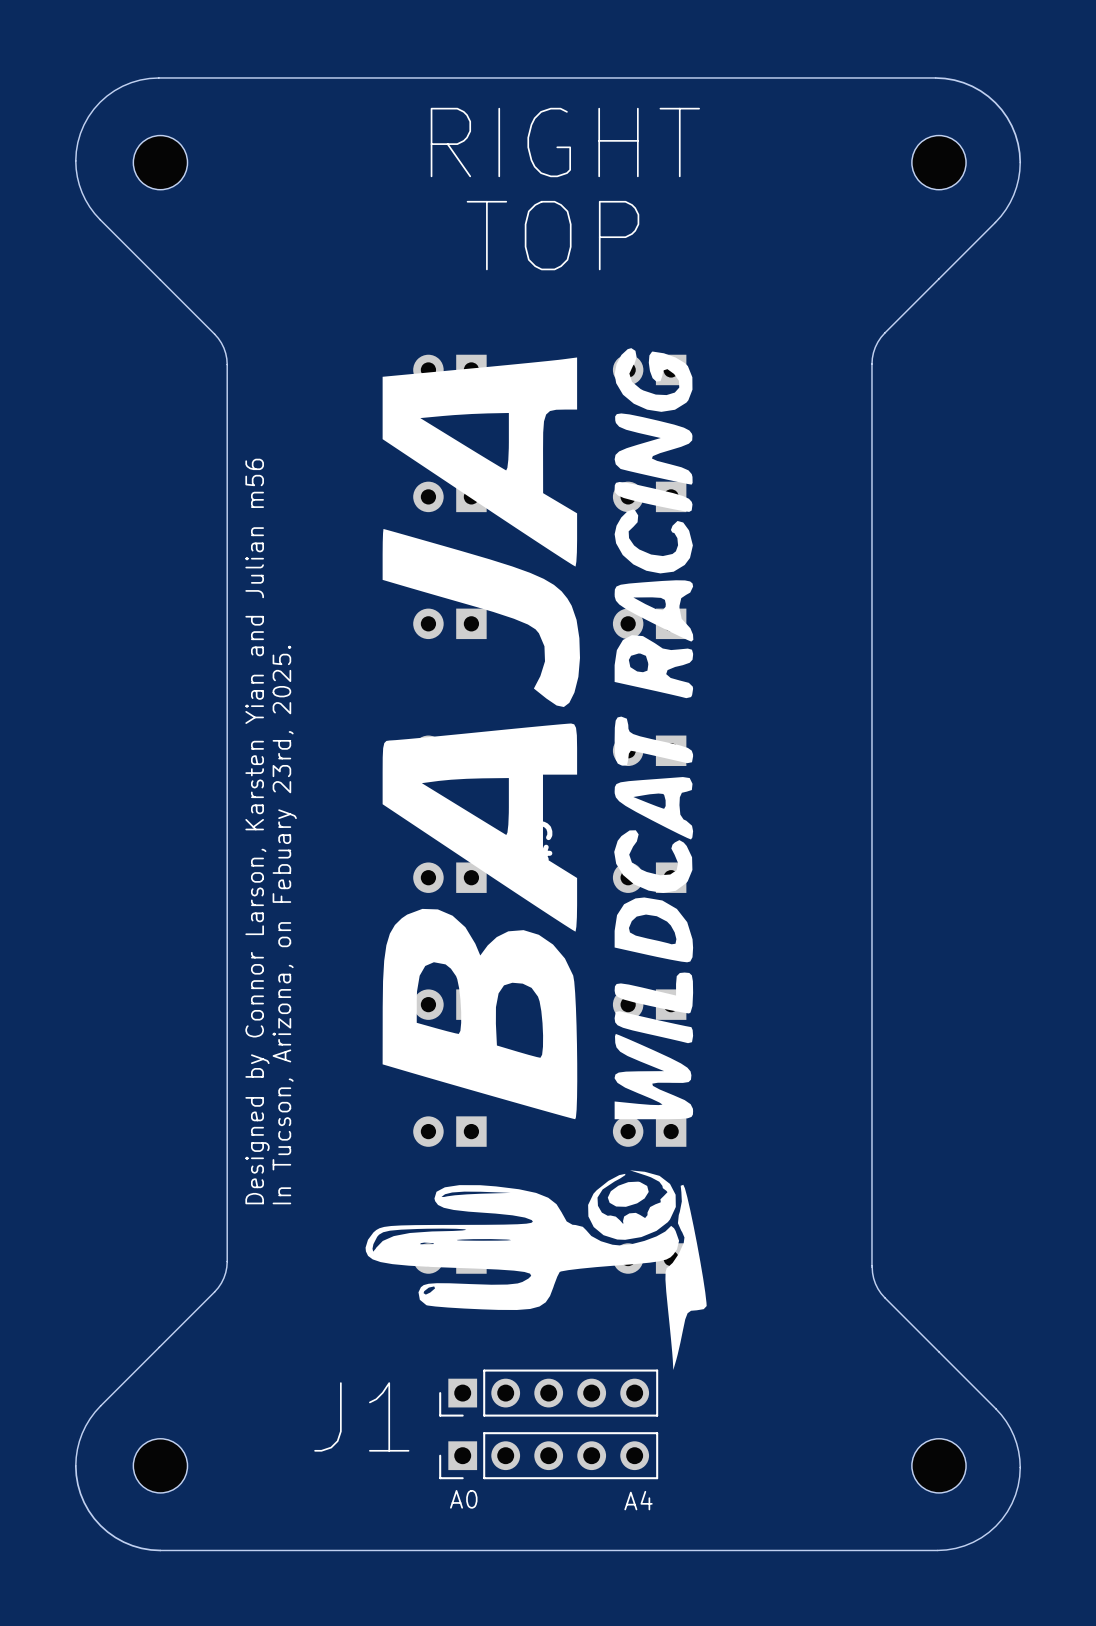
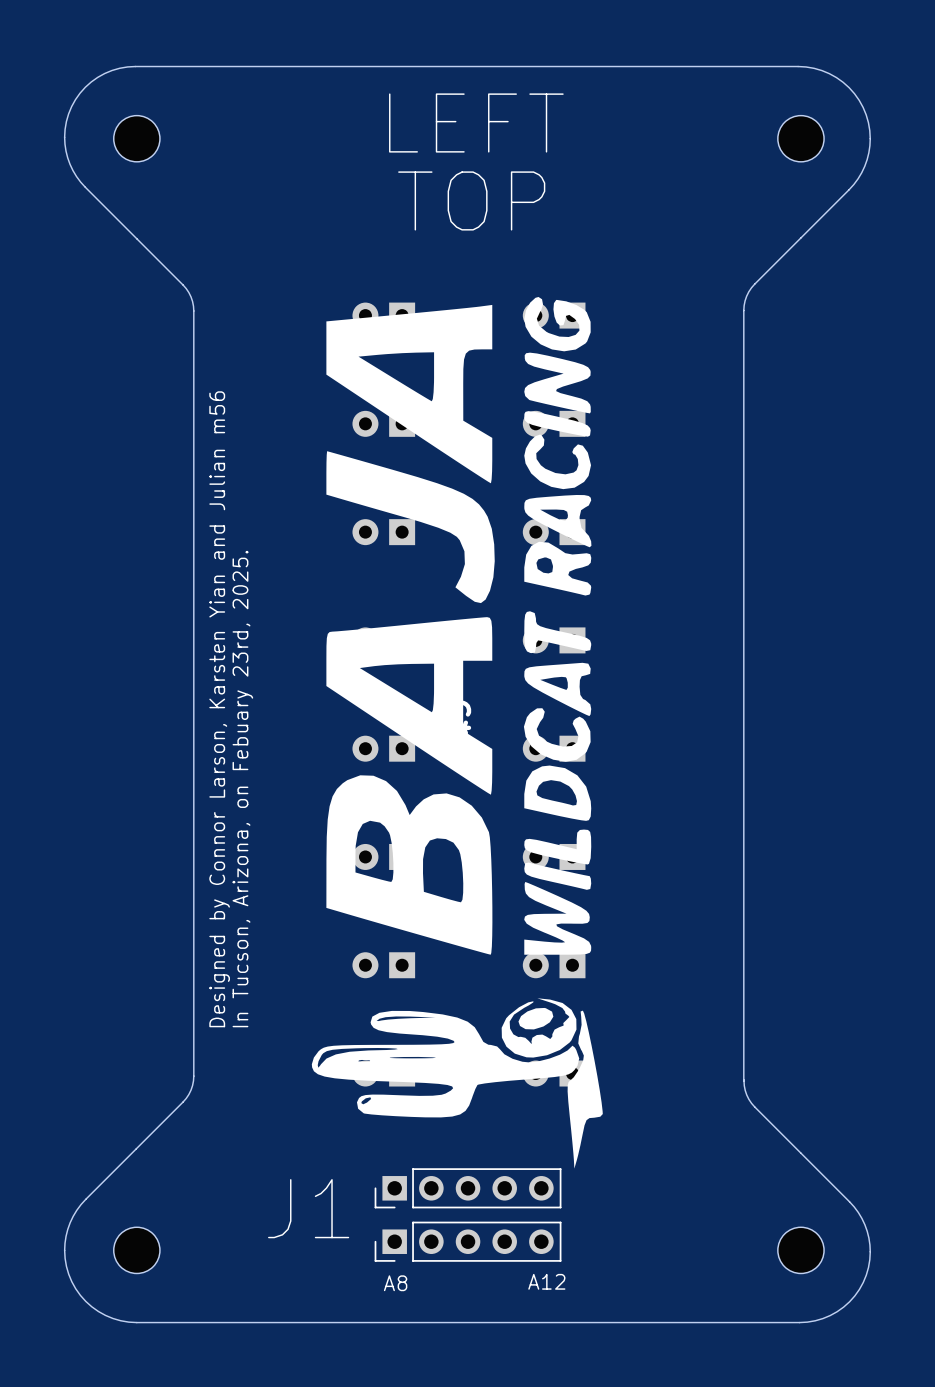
text: RIGHT (565, 142) -> none
text: none -> LEFT (476, 122)
text: A0 (463, 1499) -> A8 (395, 1283)
text: A4 (638, 1500) -> A12 (546, 1281)

